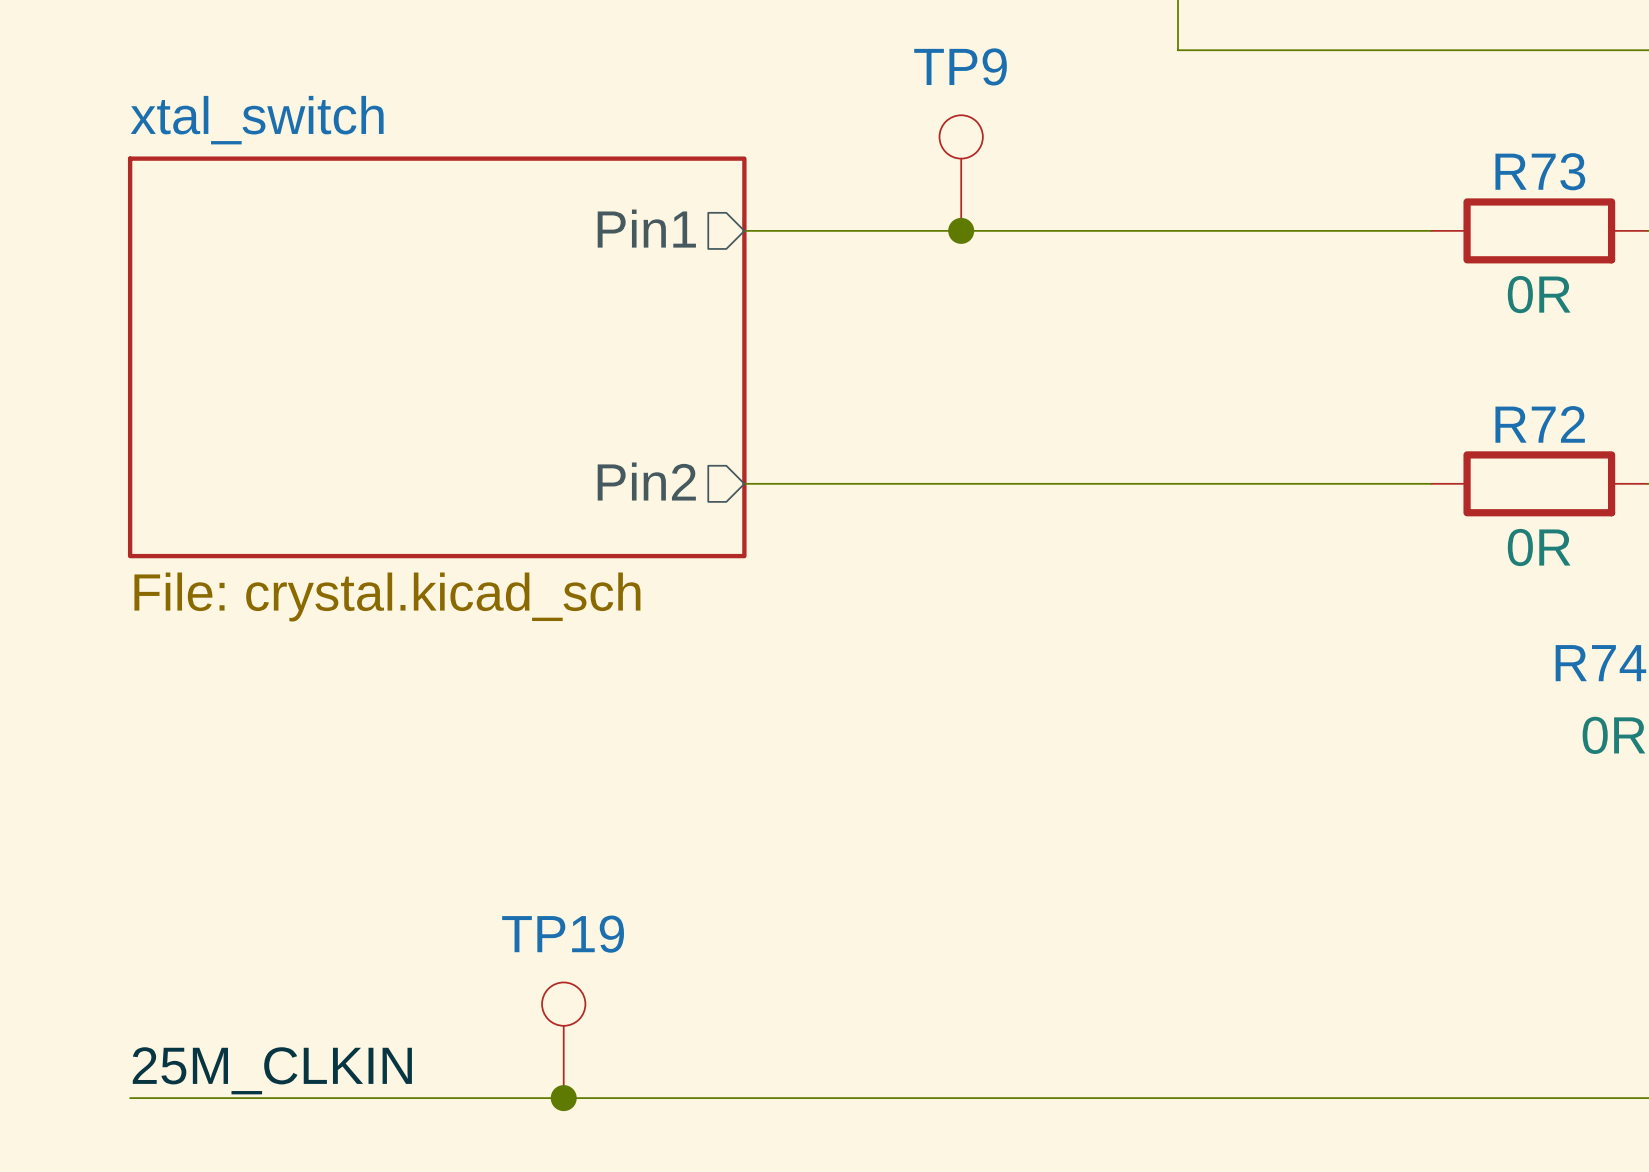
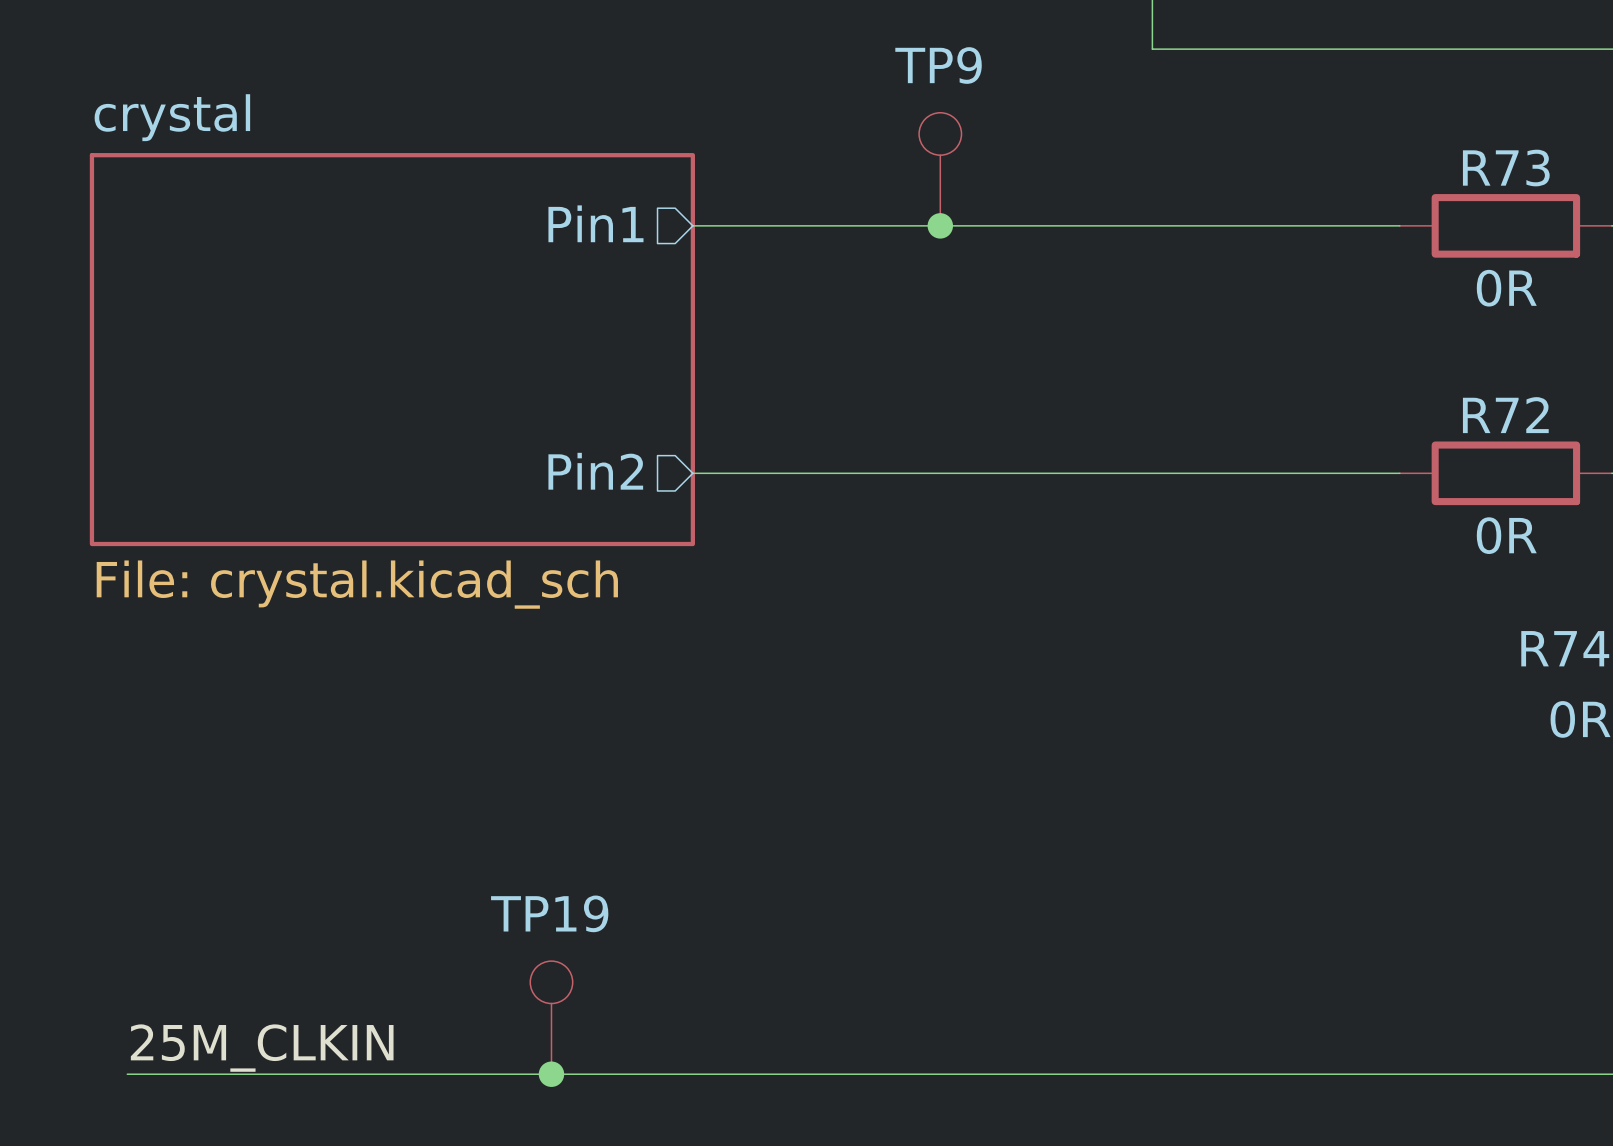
sheet pin position: Pin1 (646, 228) -> Pin1 (595, 223)
wire: none -> (692, 225) (728, 225)
sheet crystal: none -> File: crystal.kicad_sch (392, 349)
sheet xtal_switch: File: crystal.kicad_sch (437, 357) -> none
sheet pin position: Pin2 (646, 481) -> Pin2 (595, 471)
wire: none -> (692, 473) (728, 473)

